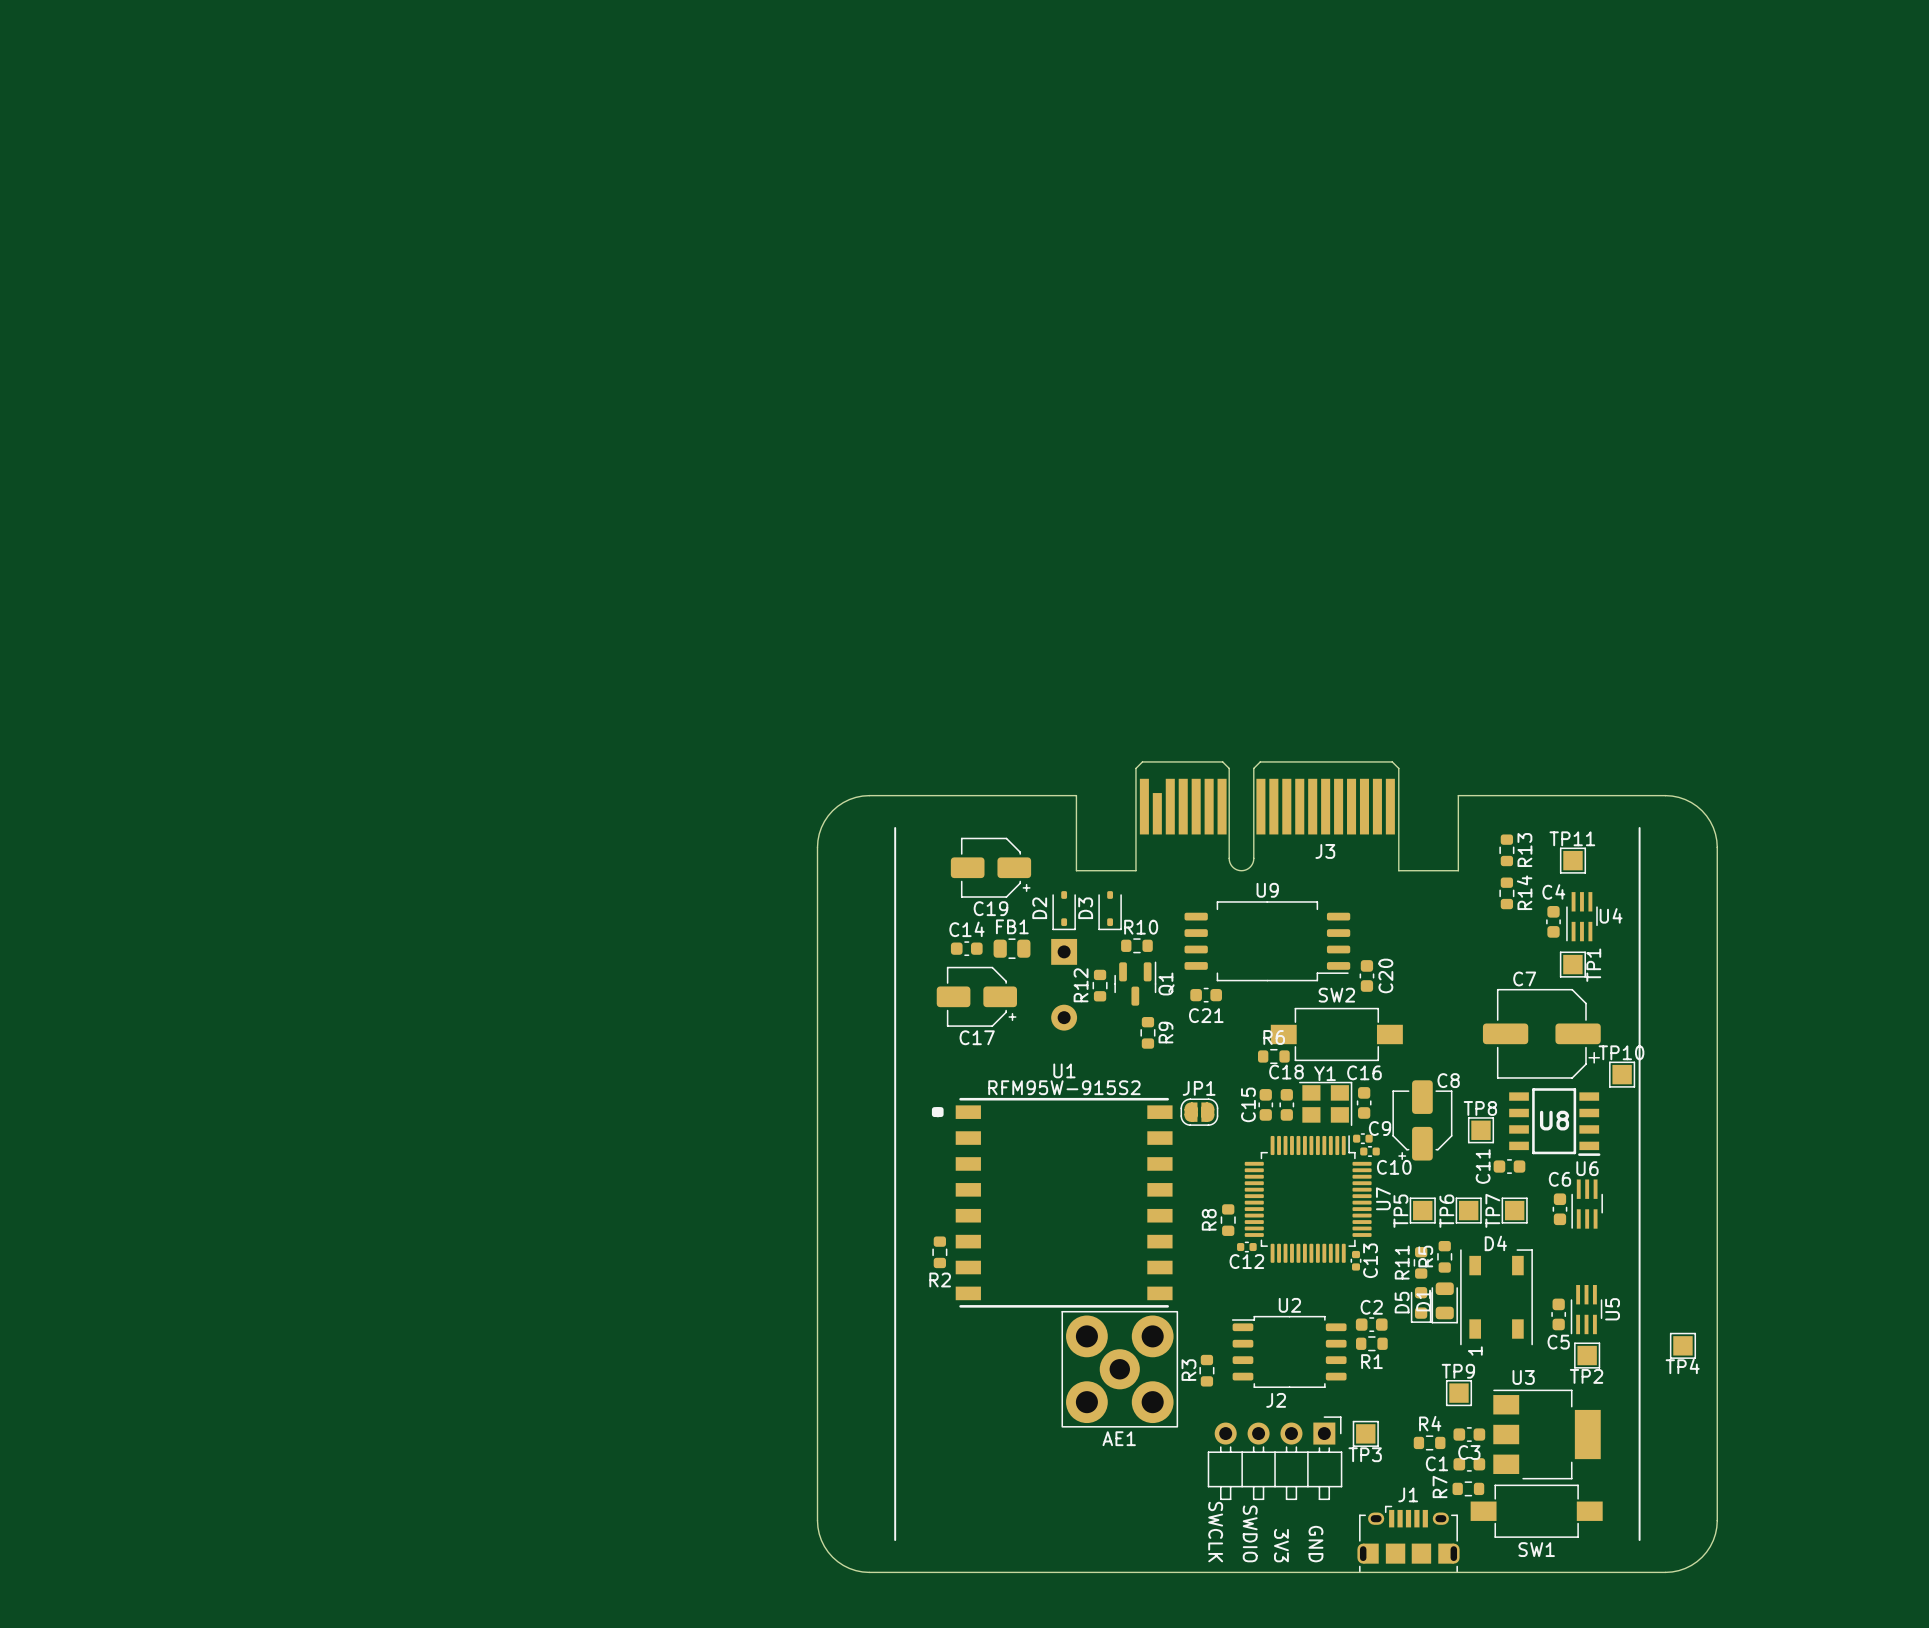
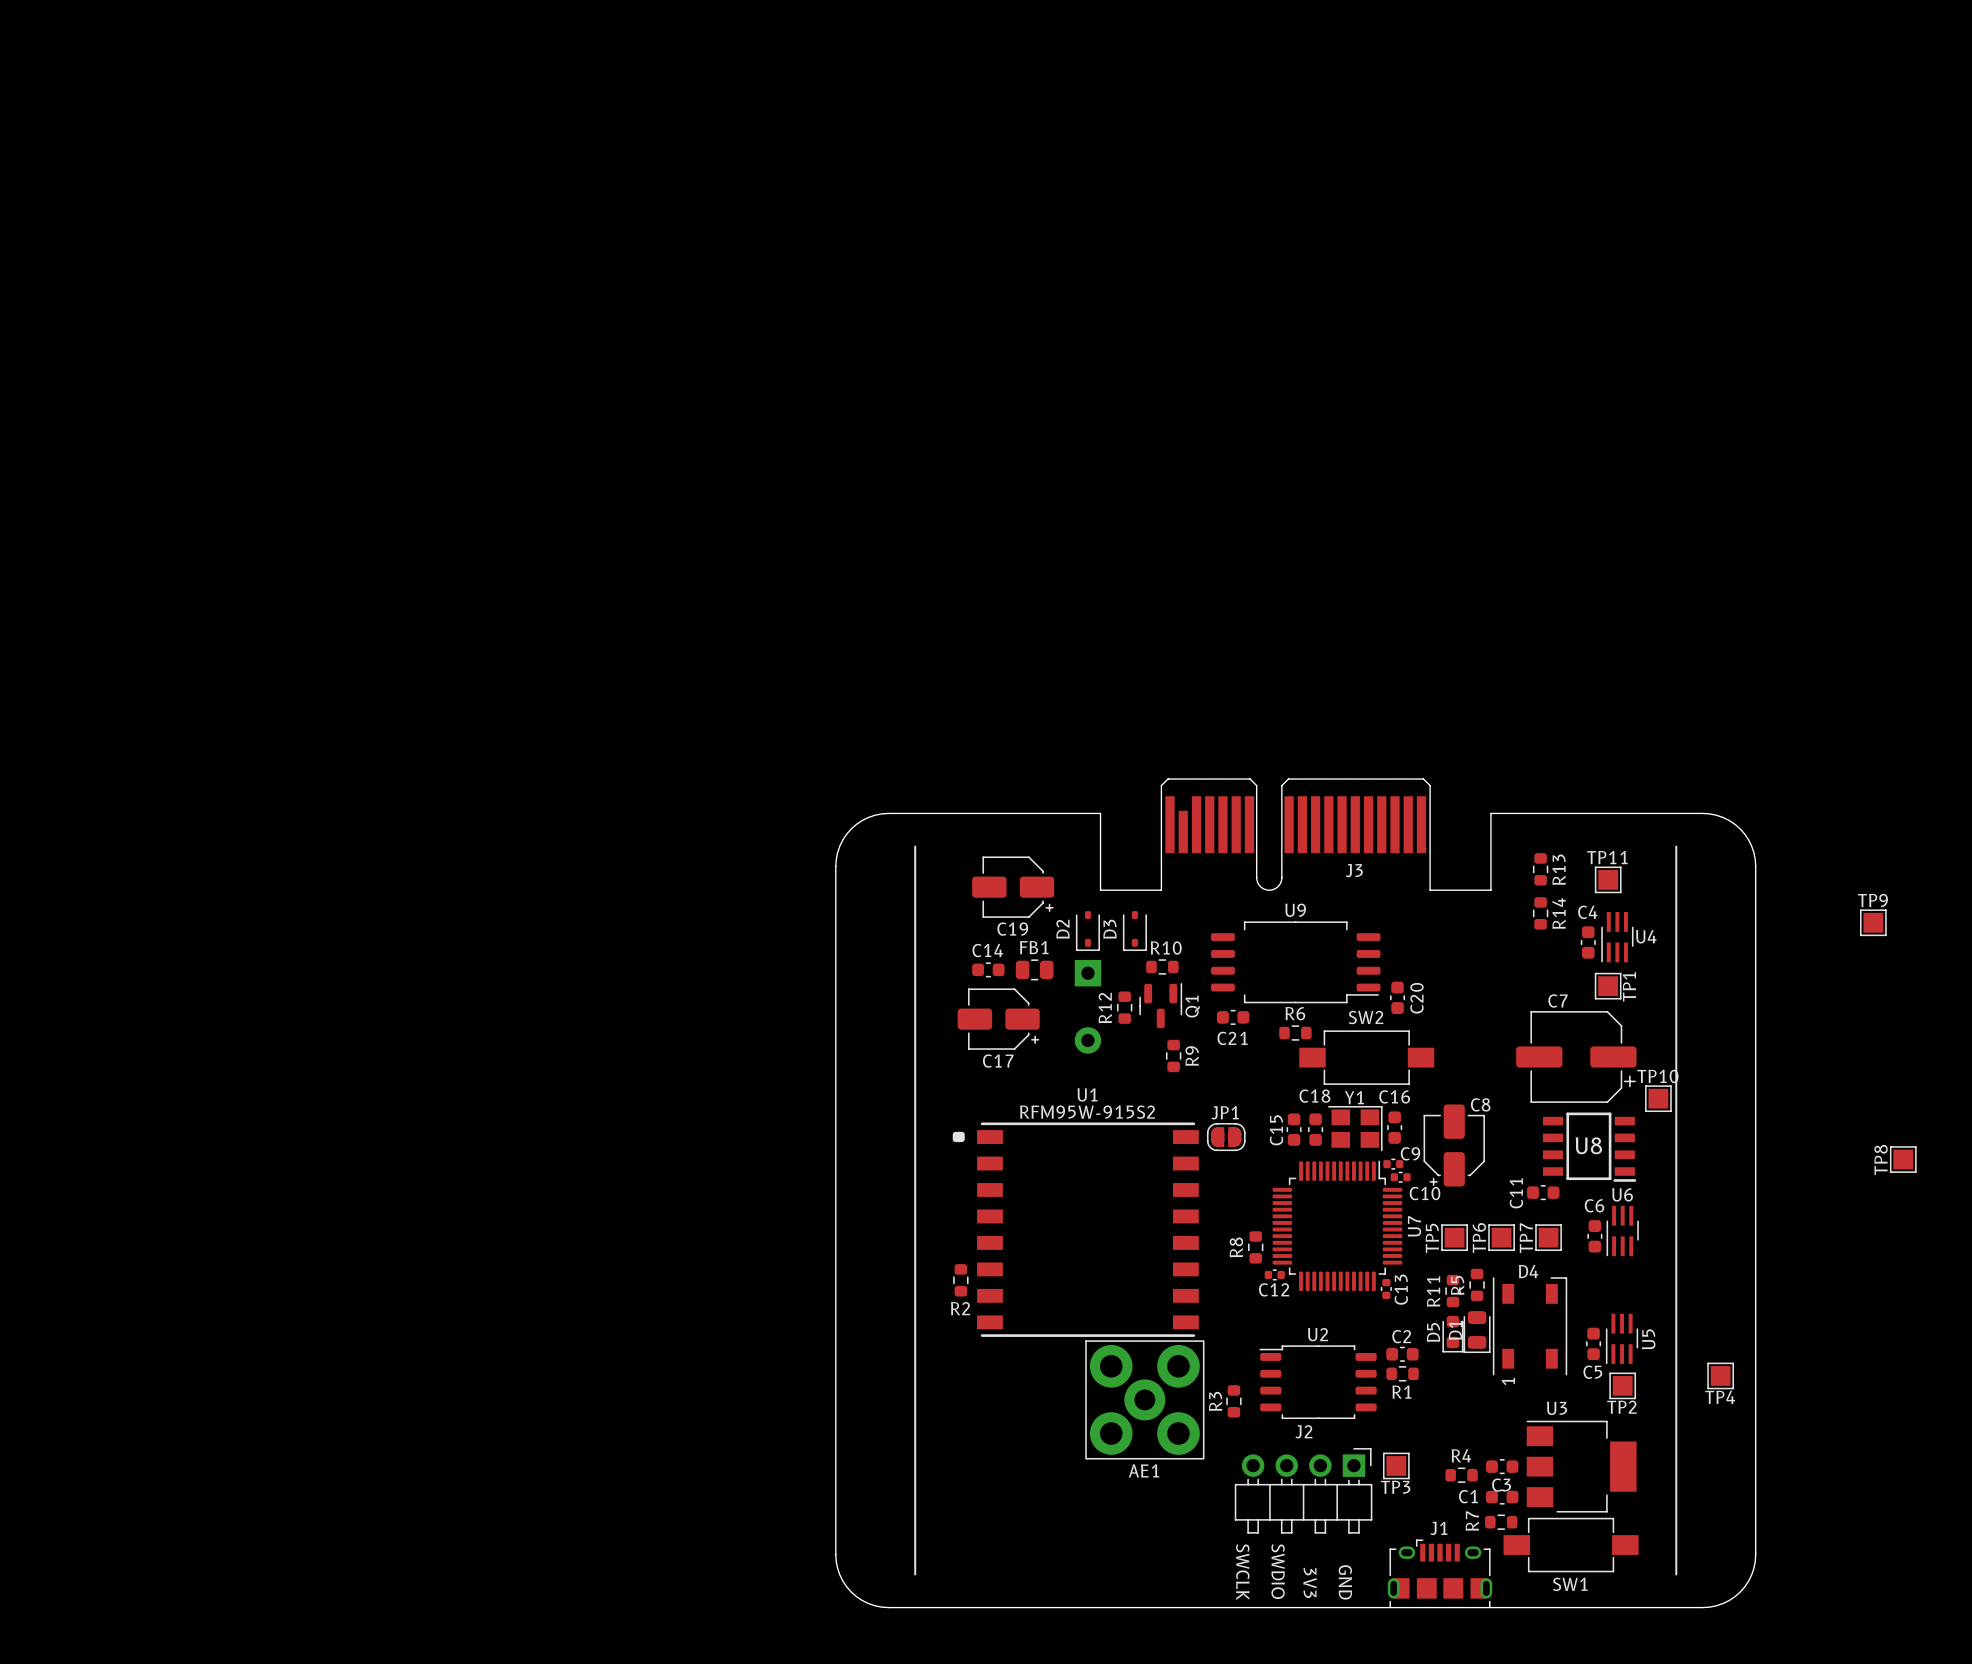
R6 position: (1273, 1056) -> (1295, 1033)
TP8 name rotation: 0° (1480, 1108) -> 90° counterclockwise (1881, 1159)
TP8 position: (1481, 1130) -> (1903, 1159)
TP9 position: (1458, 1393) -> (1873, 922)

